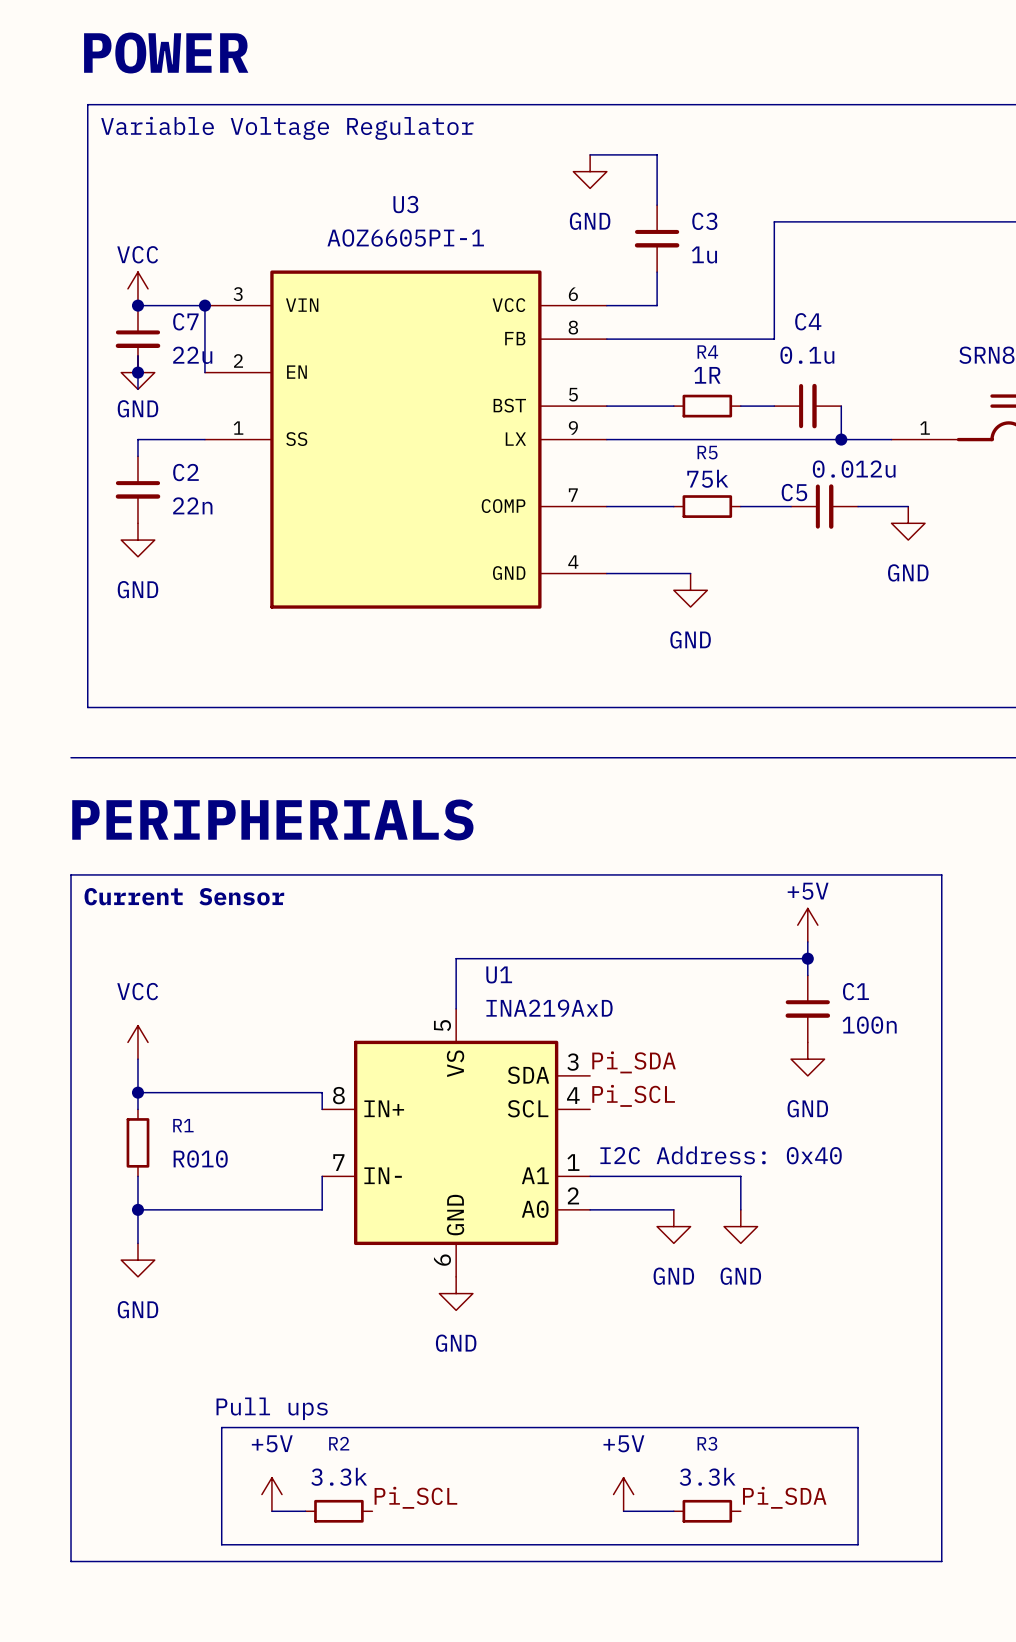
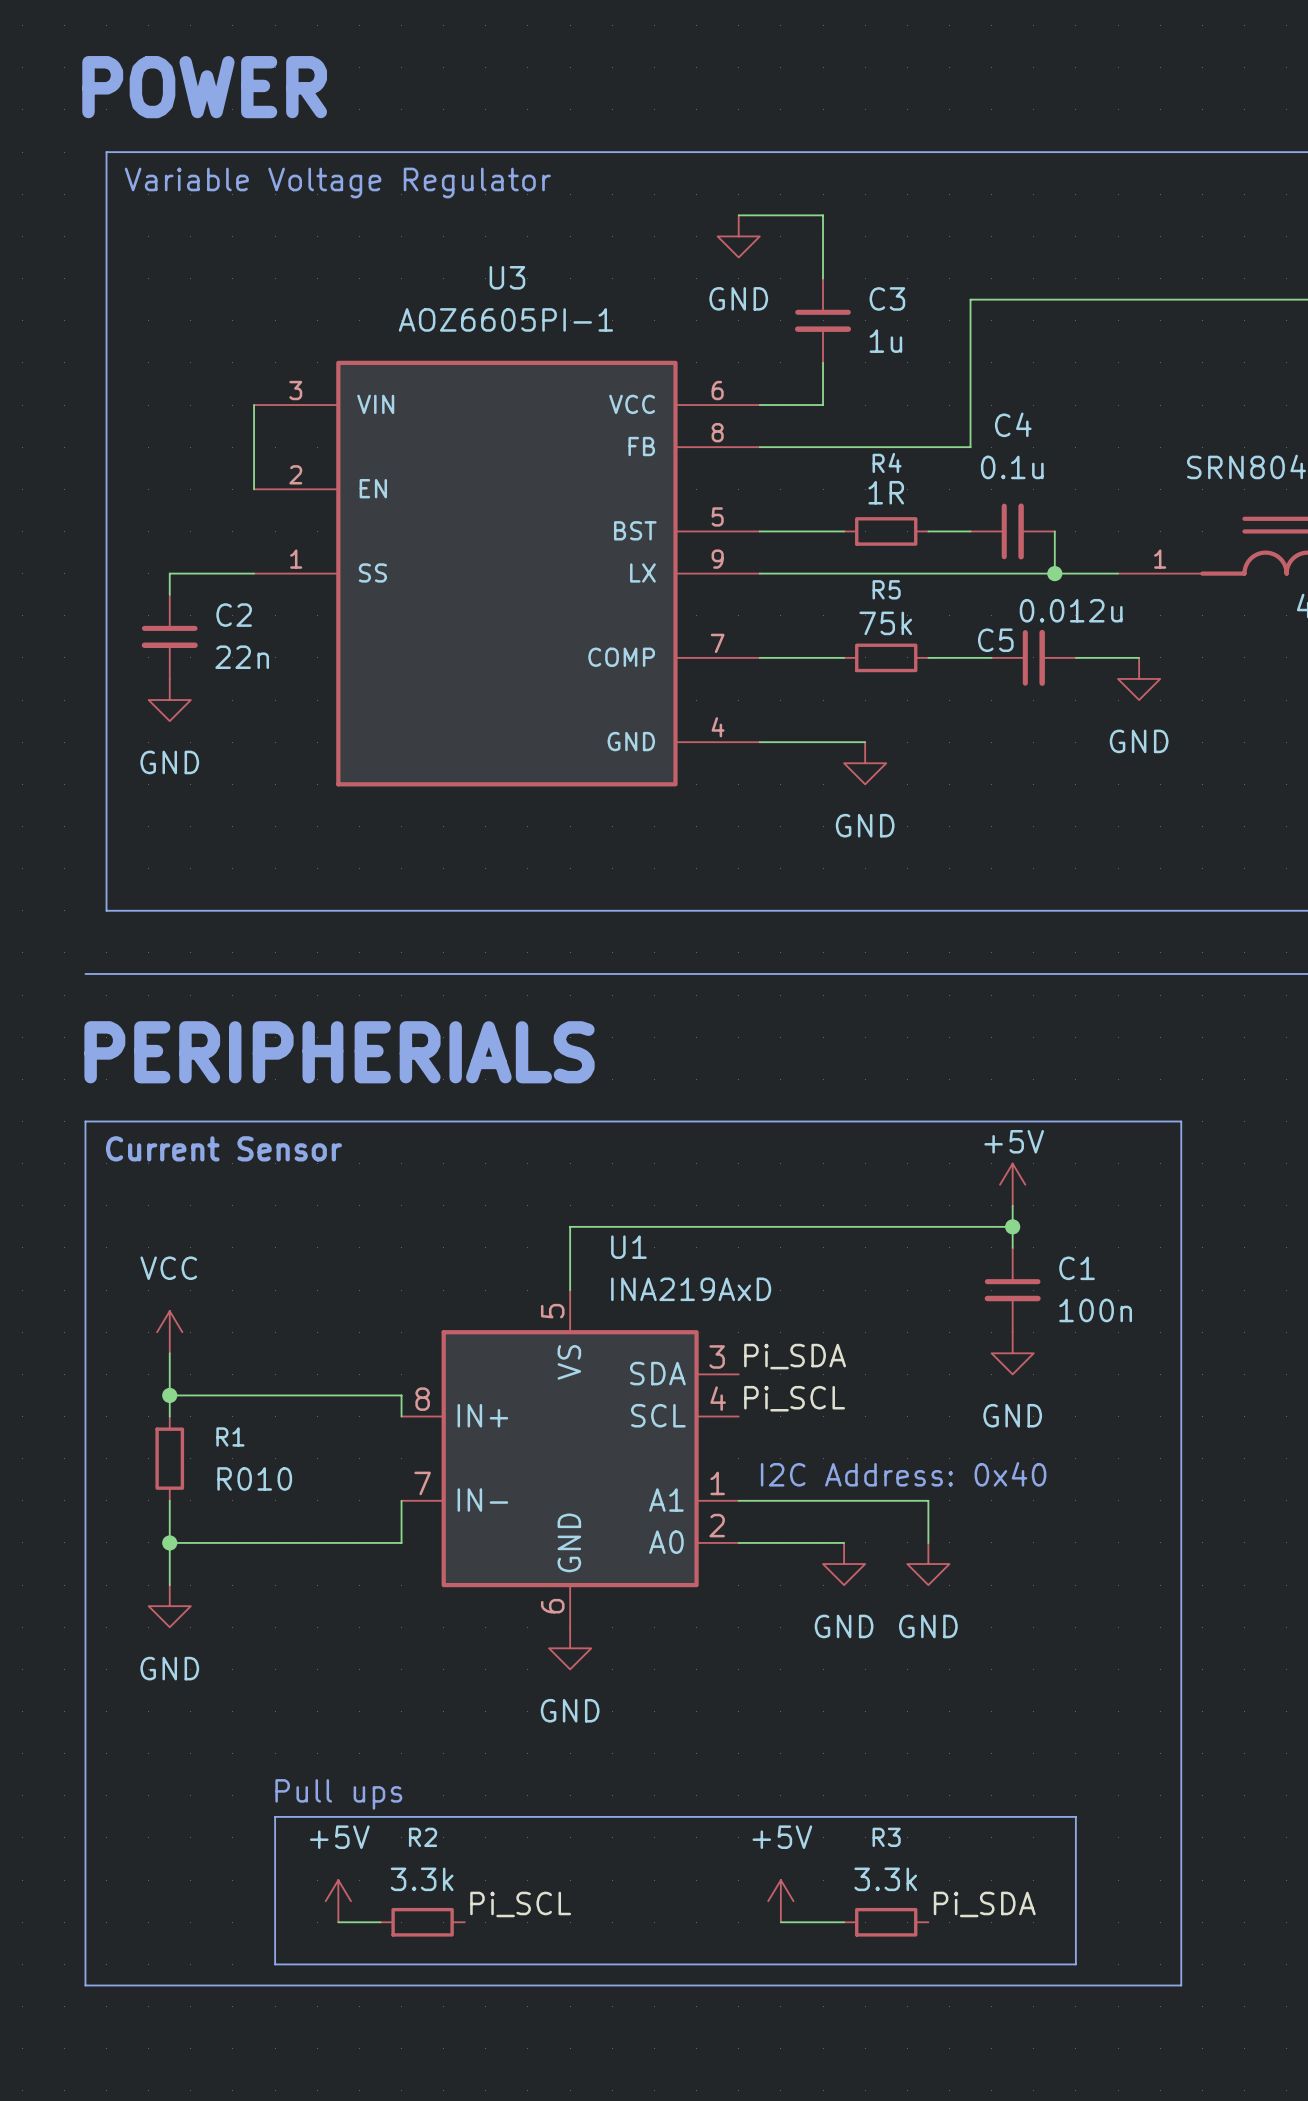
power symbol: VCC (137, 288) -> none
wire: (137, 305) (204, 305) -> none
junction: (137, 305) -> none
junction: (204, 305) -> none
C7: 22u (137, 339) -> none
wire: (137, 355) (137, 389) -> none
junction: (137, 372) -> none
power symbol: GND (137, 372) -> none

